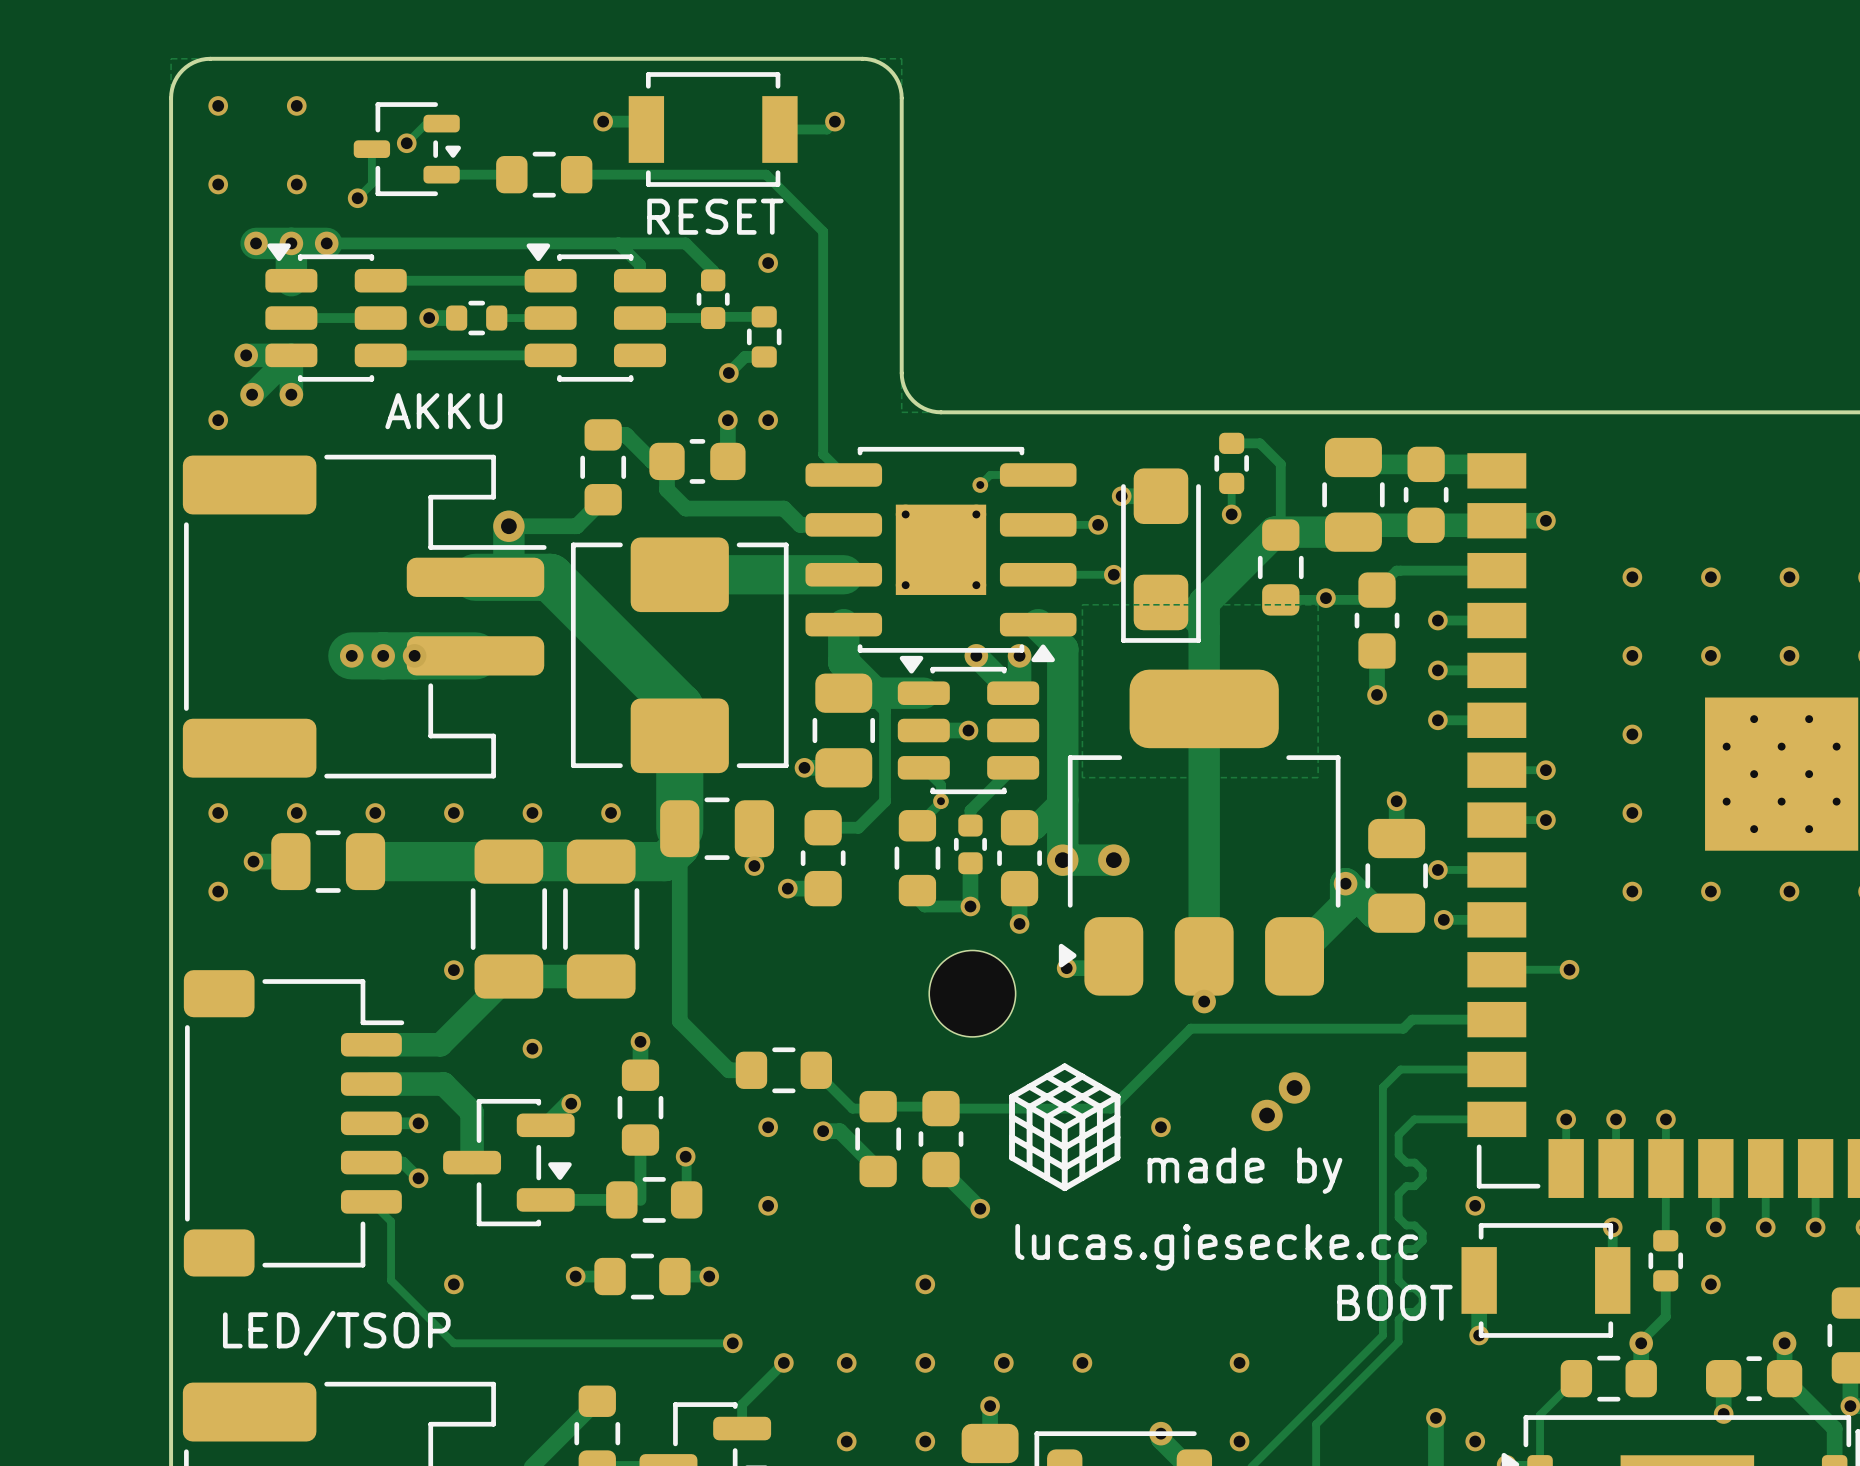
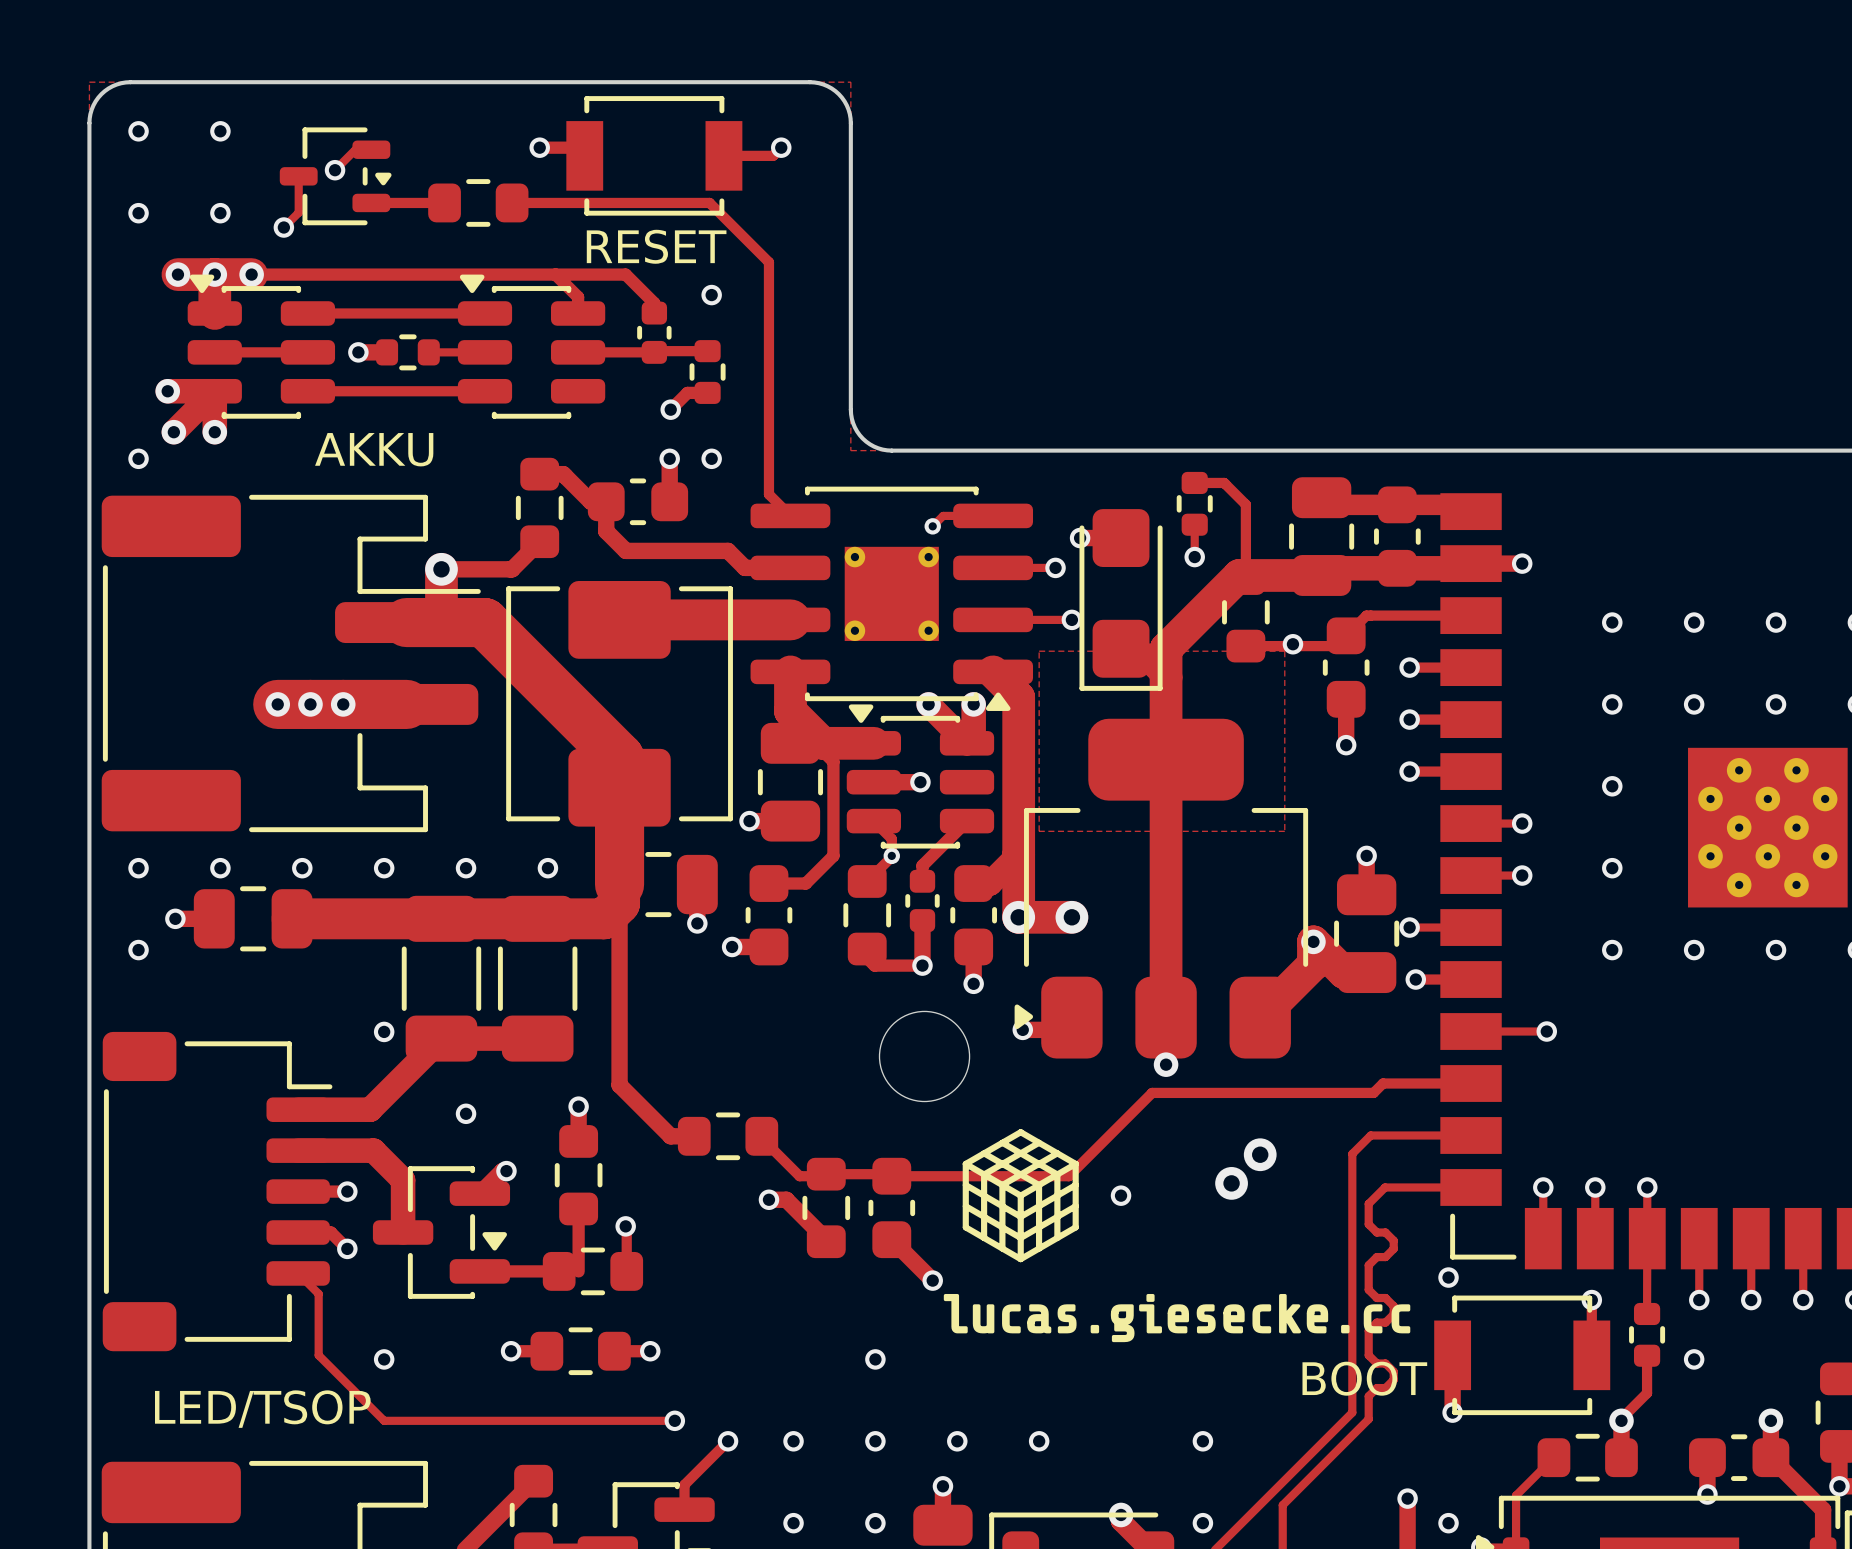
via: (768, 1127) -> none
text: made by (1244, 1170) -> none
via: (768, 1205) -> none
drawing: none -> [943, 1293, 1411, 1343]
text: lucas.giesecke.cc (1216, 1247) -> none

